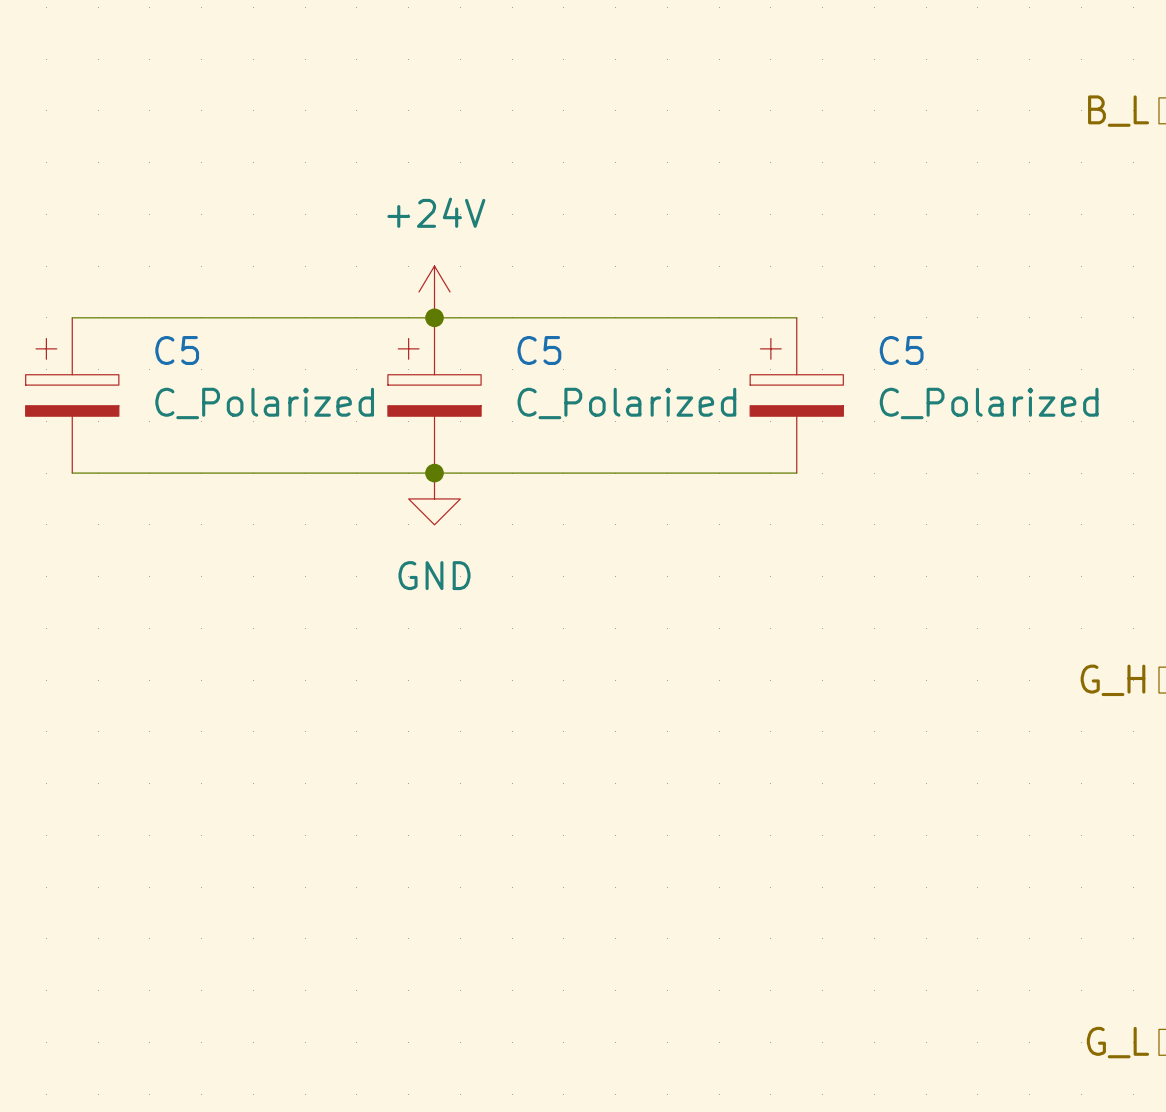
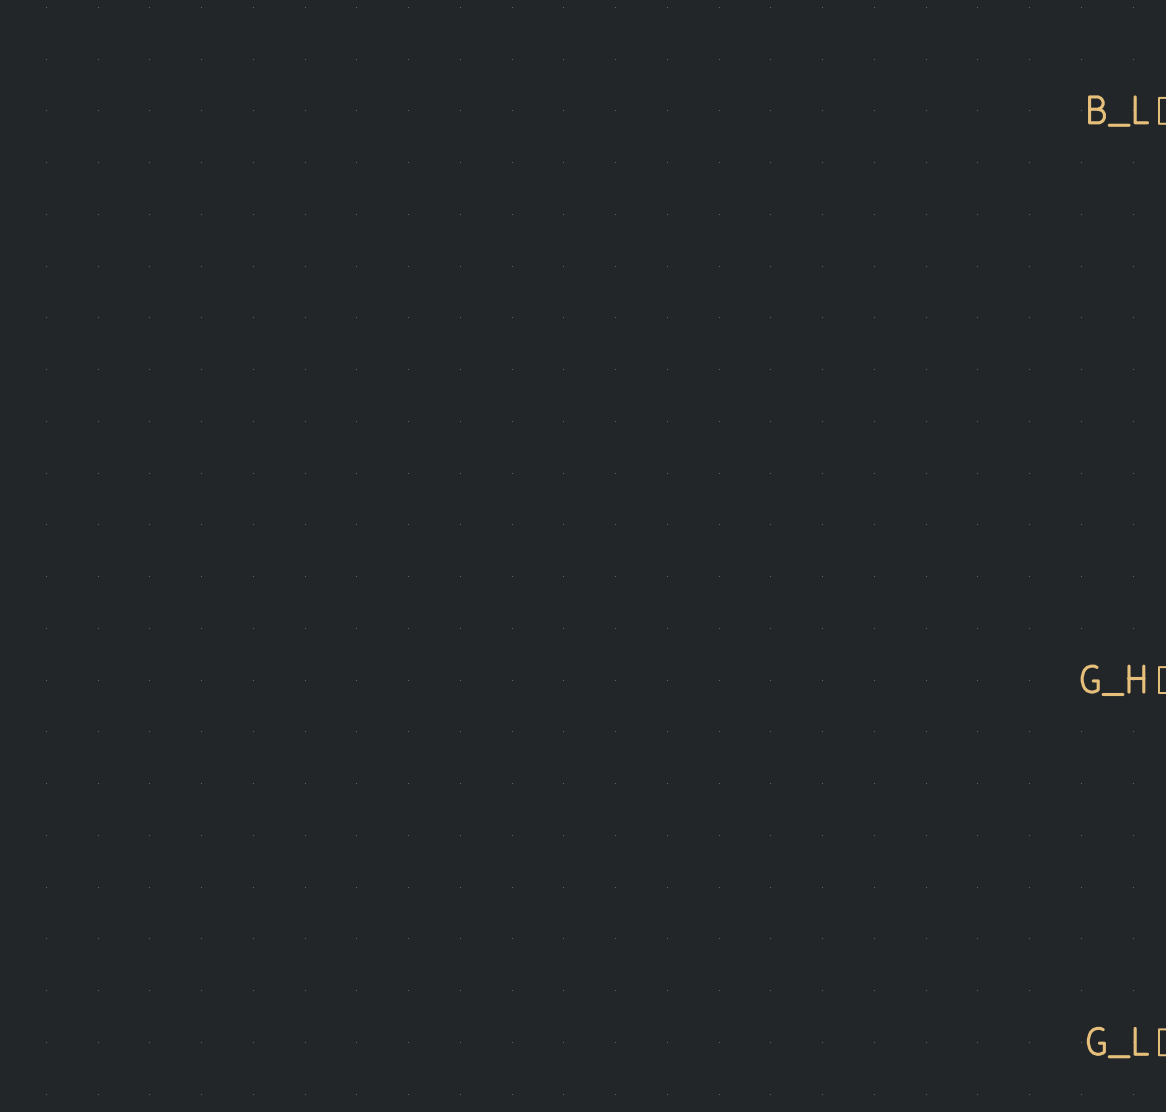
power symbol: +24V (434, 291) -> none
wire: (72, 317) (796, 317) -> none
junction: (434, 317) -> none
C5: C_Polarized (72, 395) -> none
C5: C_Polarized (434, 395) -> none
C5: C_Polarized (796, 395) -> none
wire: (72, 473) (796, 473) -> none
junction: (434, 473) -> none
power symbol: GND (434, 498) -> none

